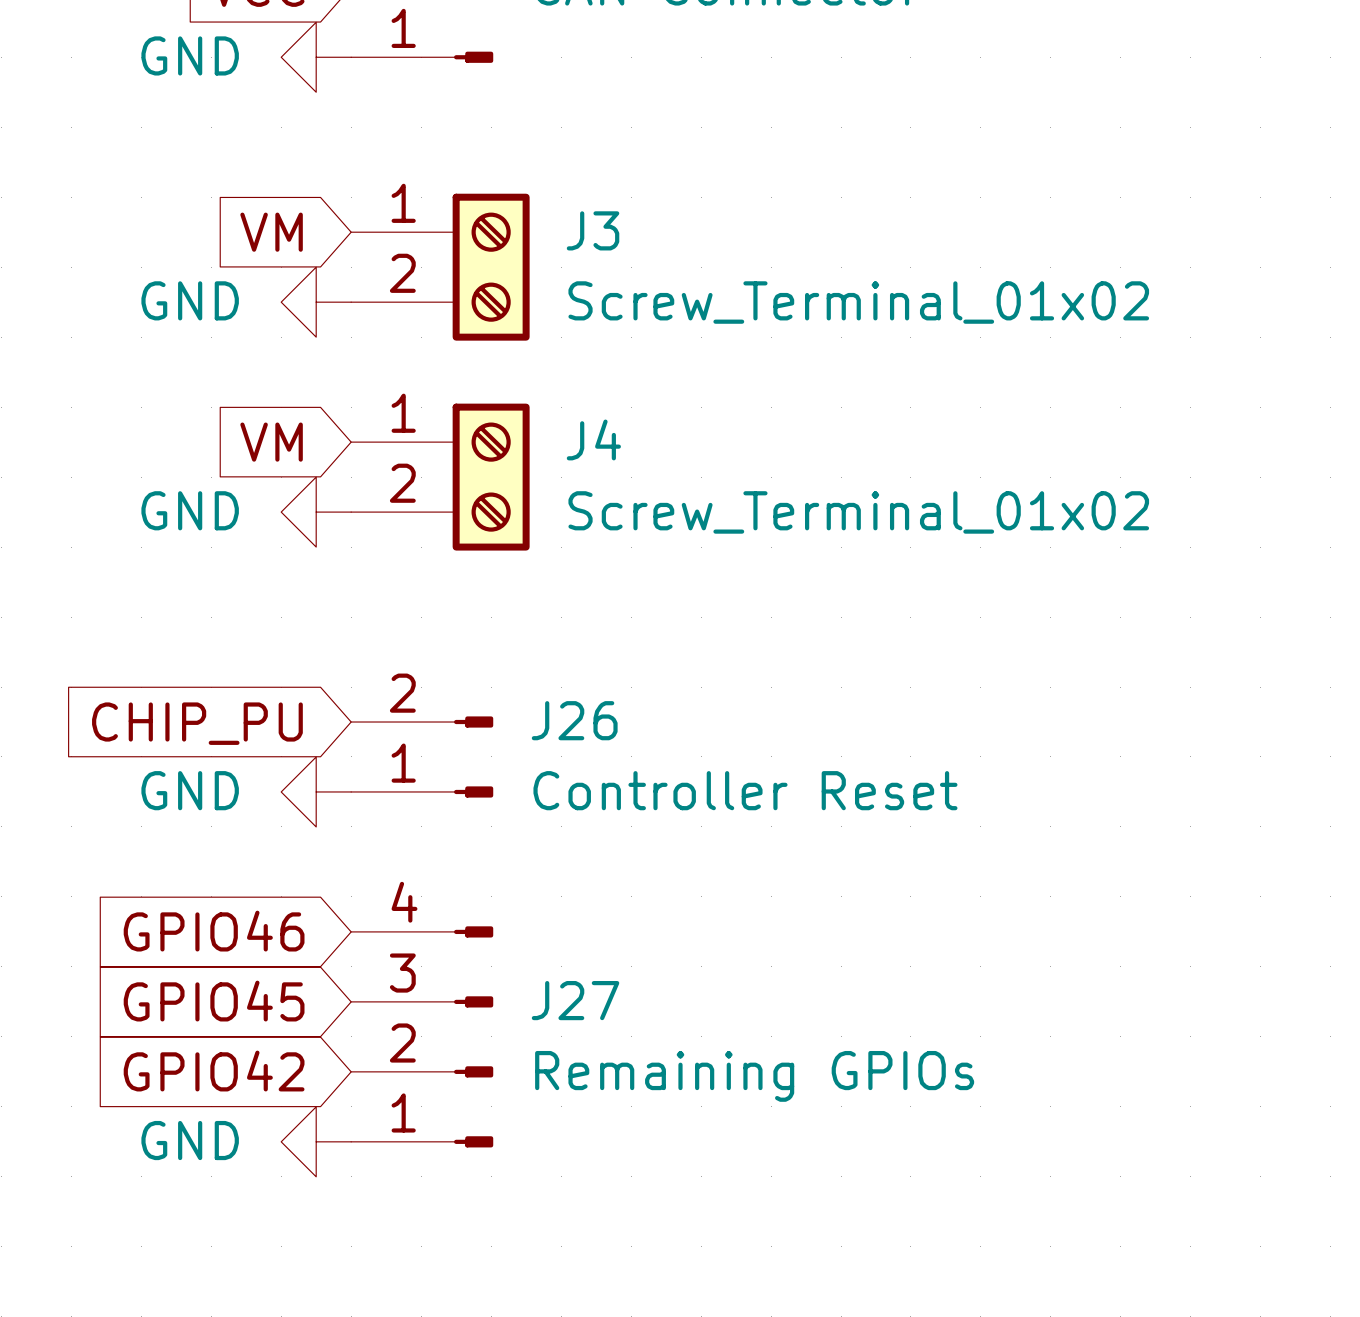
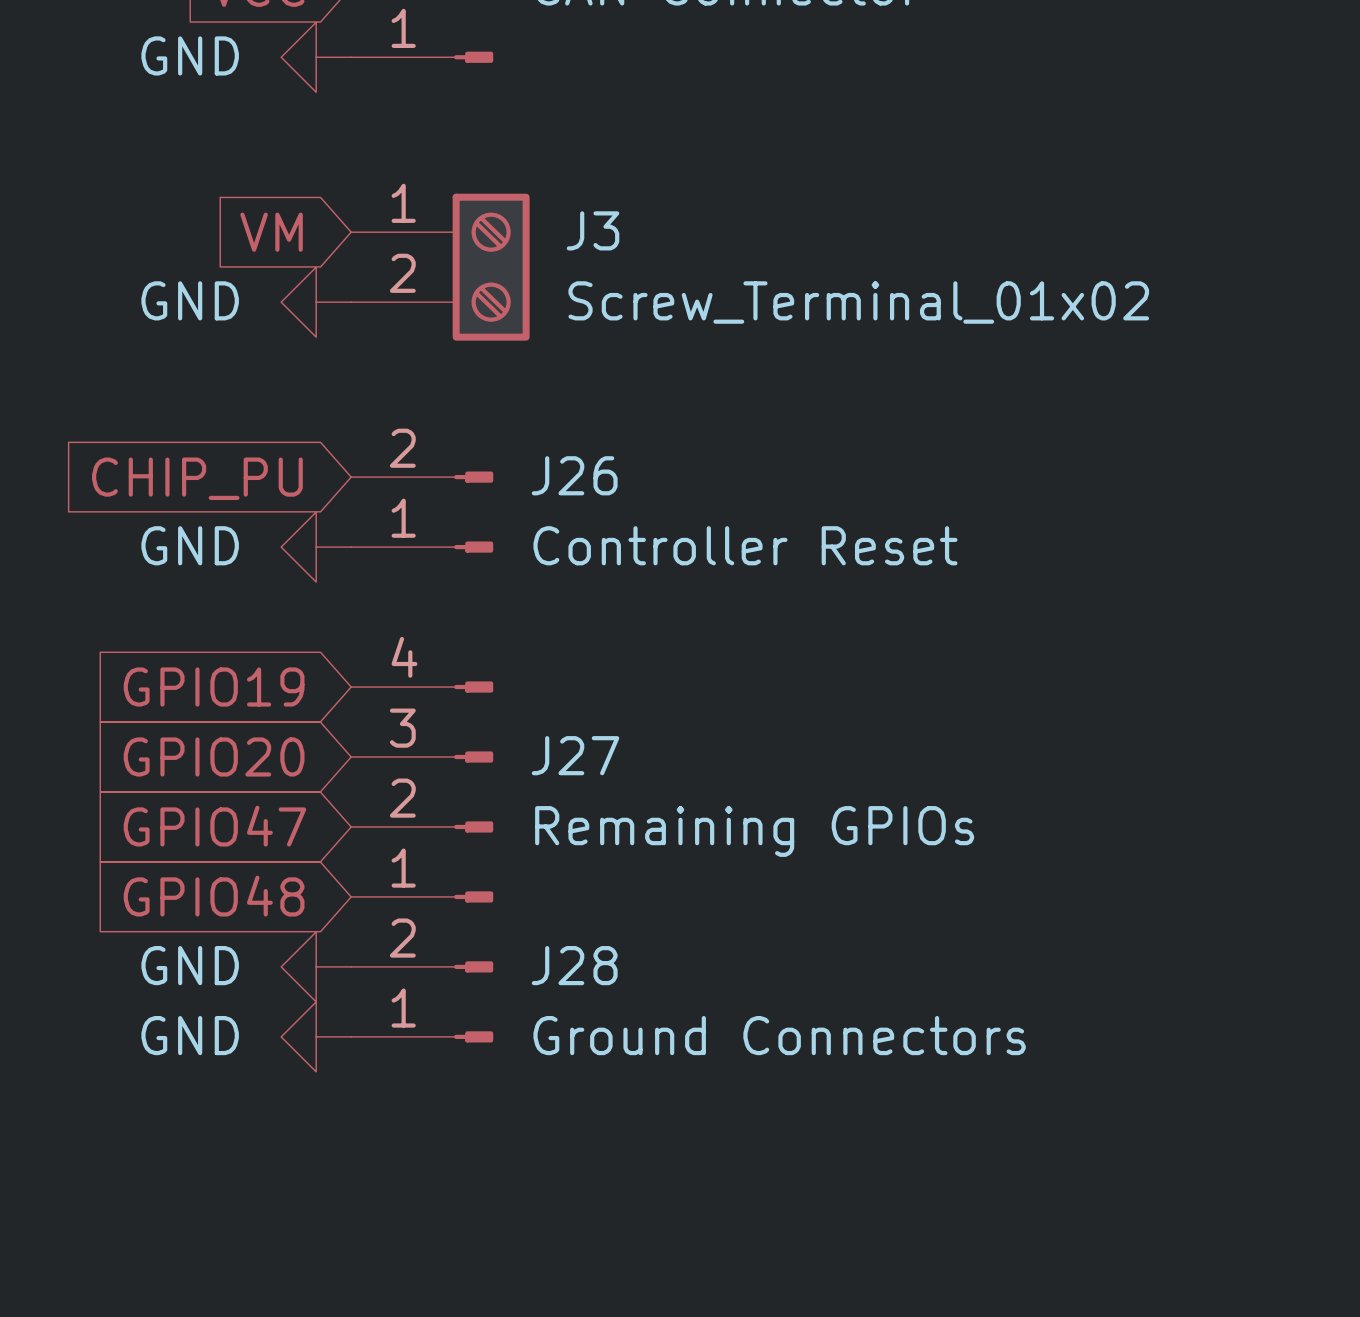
global label: VM (271, 442) -> none
J4: Screw_Terminal_01x02 (440, 477) -> none
power symbol position: GND (316, 512) -> GND (316, 547)
global label: none -> GPIO19 (214, 687)
global label position: CHIP_PU (197, 723) -> CHIP_PU (197, 478)
global label: none -> GPIO20 (214, 756)
J26 position: (422, 756) -> (422, 512)
power symbol: GND (316, 791) -> none
global label: none -> GPIO47 (214, 826)
global label: GPIO46 (214, 931) -> GPIO48 (214, 896)
power symbol: none -> GND (316, 966)
global label: GPIO45 (214, 1001) -> none
J28: none -> Ground Connectors (422, 1001)
power symbol: none -> GND (316, 1036)
J27 position: (422, 1036) -> (422, 791)
global label: GPIO42 (214, 1071) -> none
power symbol: GND (316, 1141) -> none

